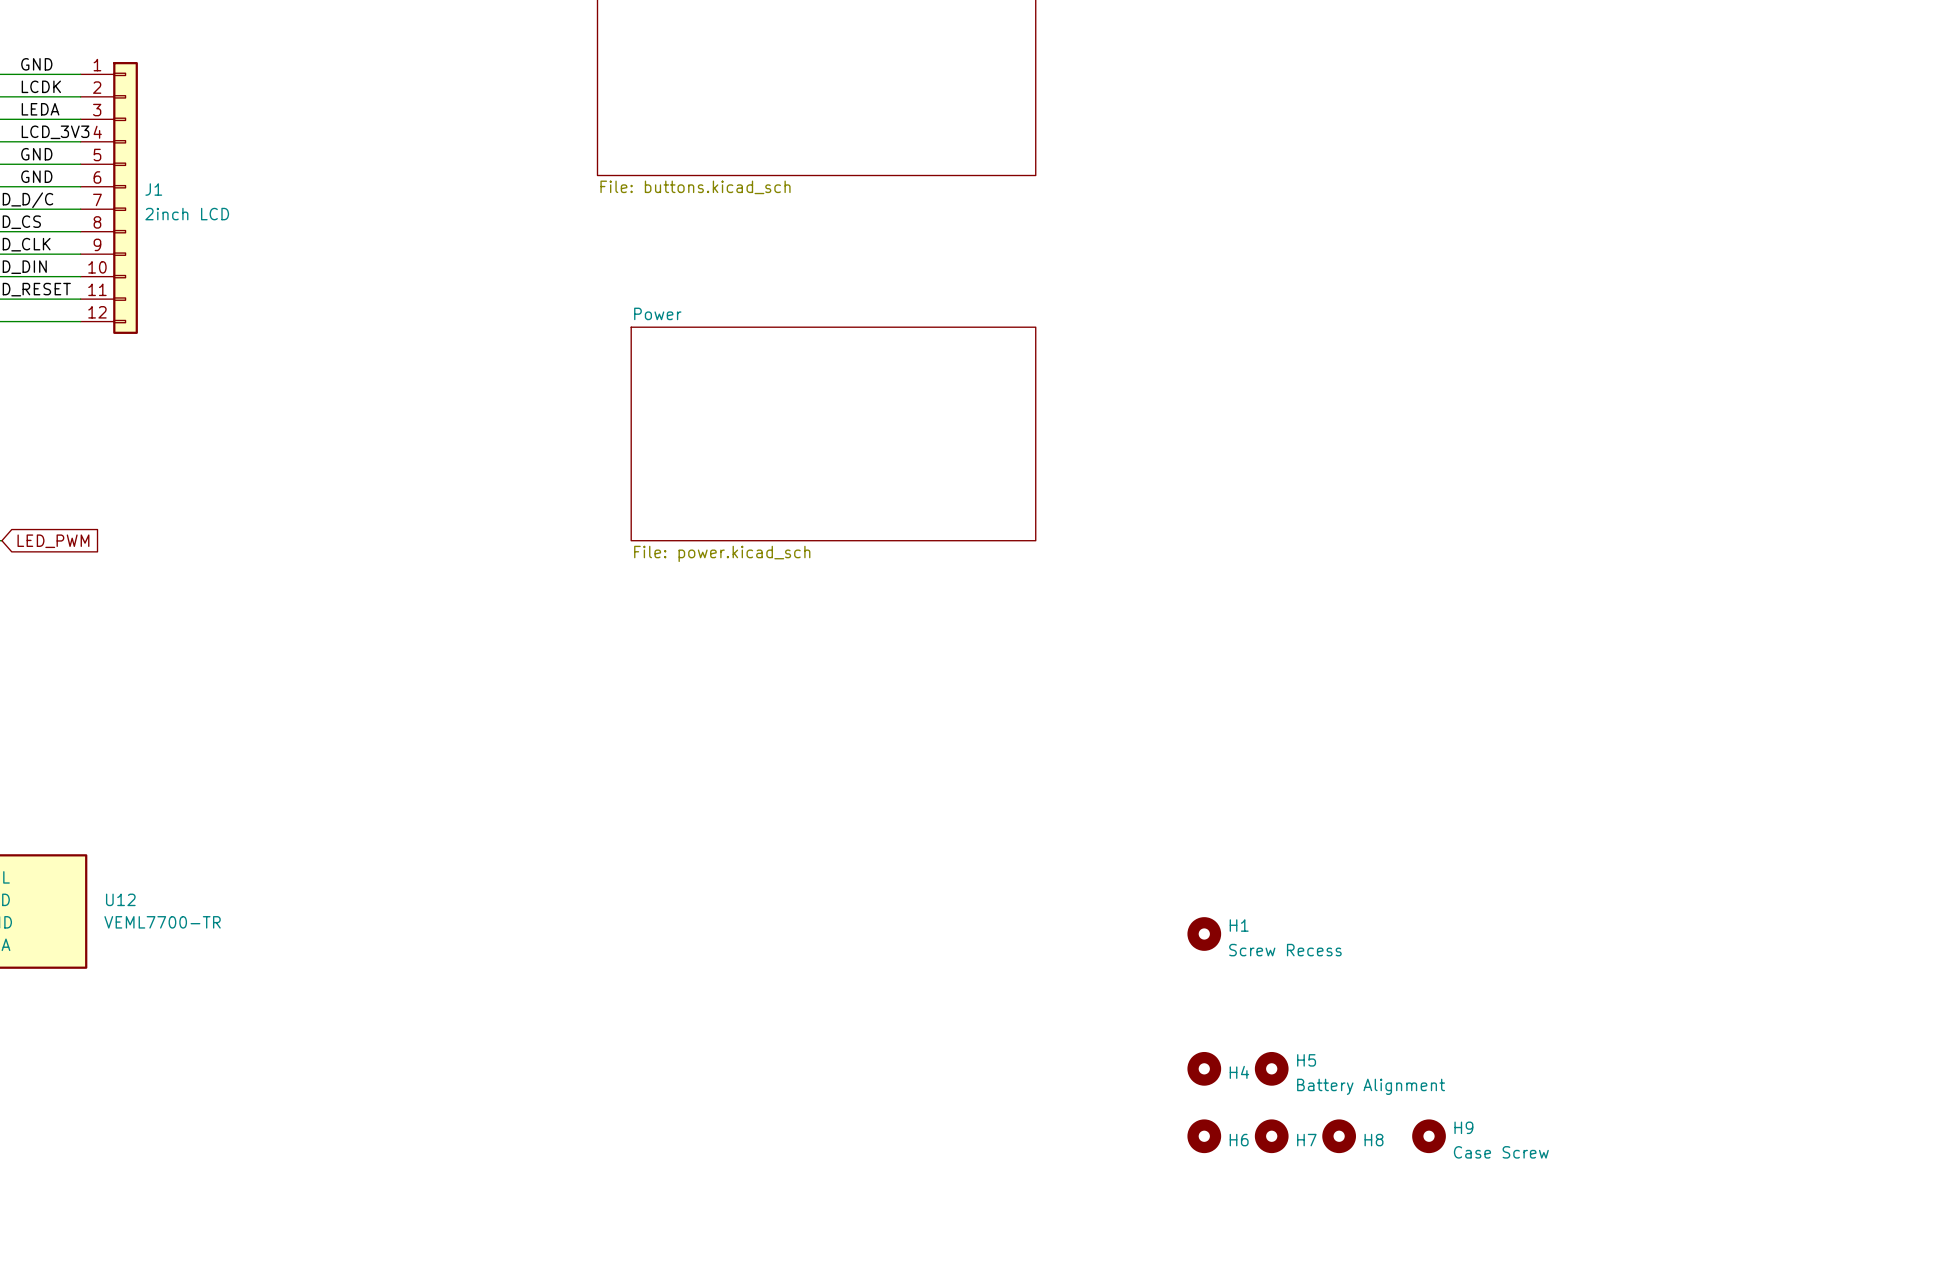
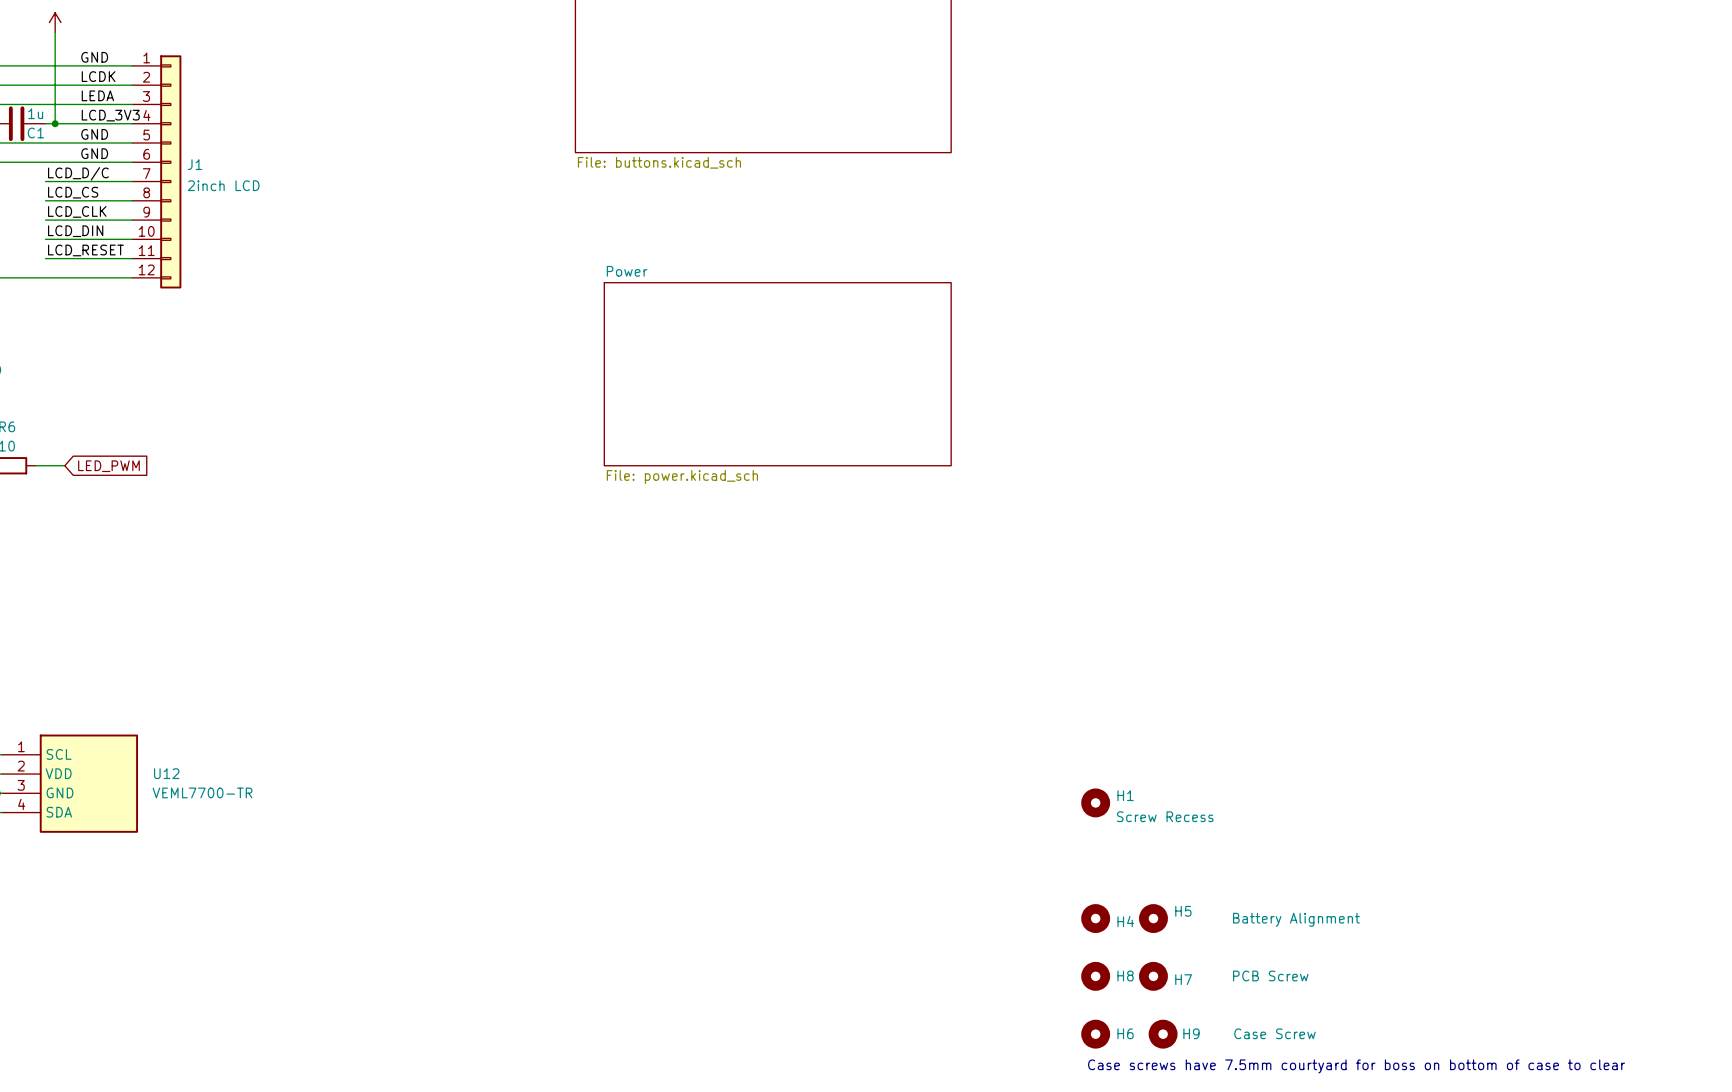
H5 value position: Battery Alignment (1371, 1086) -> Battery Alignment (1296, 919)
H9 name position: H9 (1463, 1127) -> H9 (1191, 1033)
H7 value: none -> PCB Screw (1270, 975)
H8: (1339, 1136) -> none
H9 position: (1429, 1136) -> (1163, 1034)
H6 name: H6 (1239, 1140) -> H8 (1125, 975)
H9 value position: Case Screw (1501, 1152) -> Case Screw (1274, 1033)
H6: none -> (1095, 1034)
text: none -> Case screws have 7.5mm courtyard for boss on bottom of case to clear (1356, 1066)

